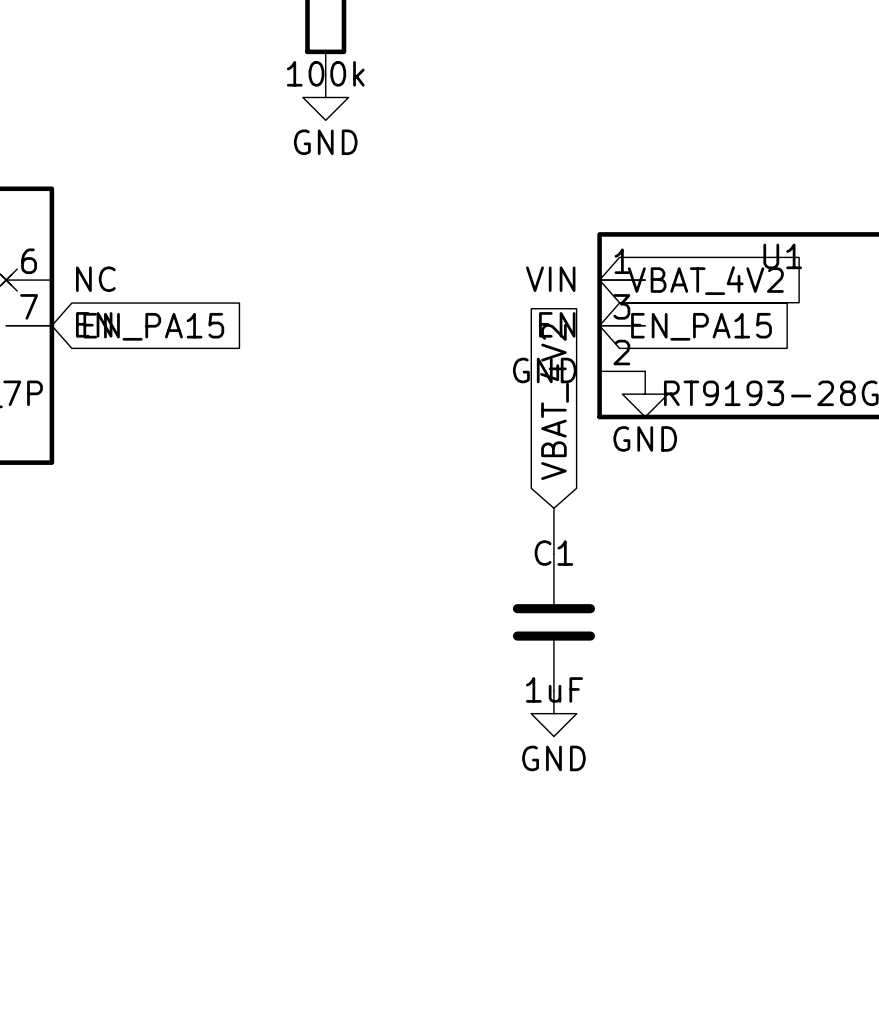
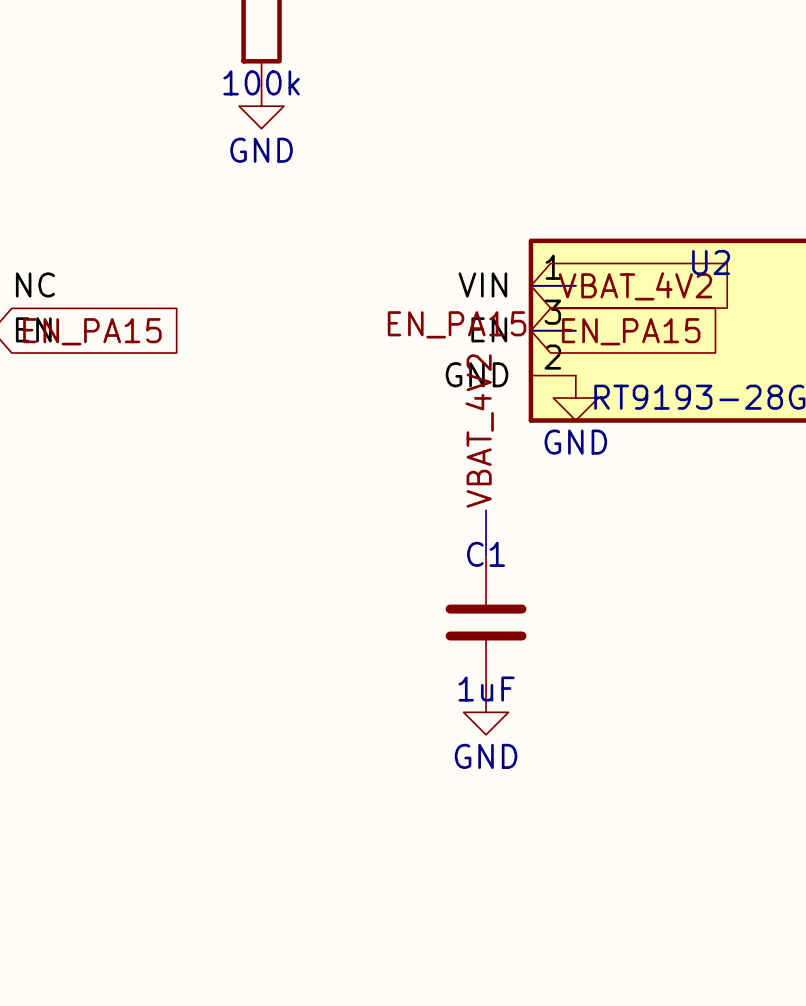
U1 name: U1 (782, 256) -> U2 (711, 262)
label: none -> EN_PA15 (457, 324)
global label: VBAT_4V2 (554, 402) -> none
label: none -> VBAT_4V2 (479, 431)

